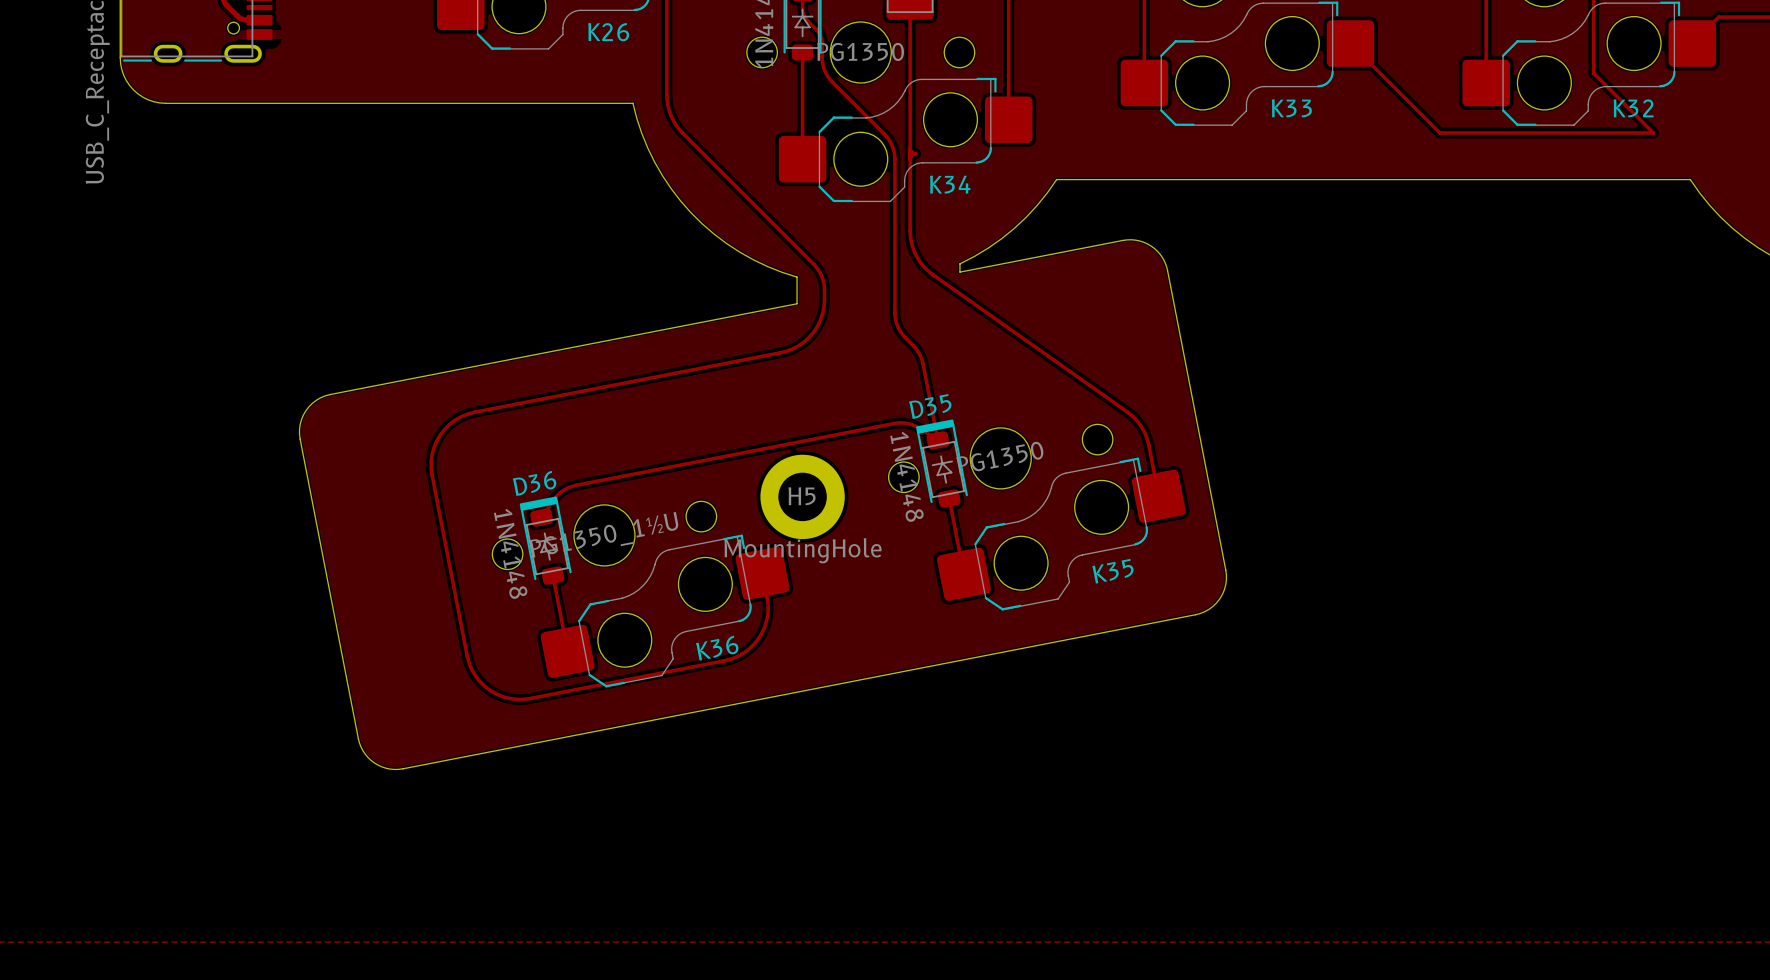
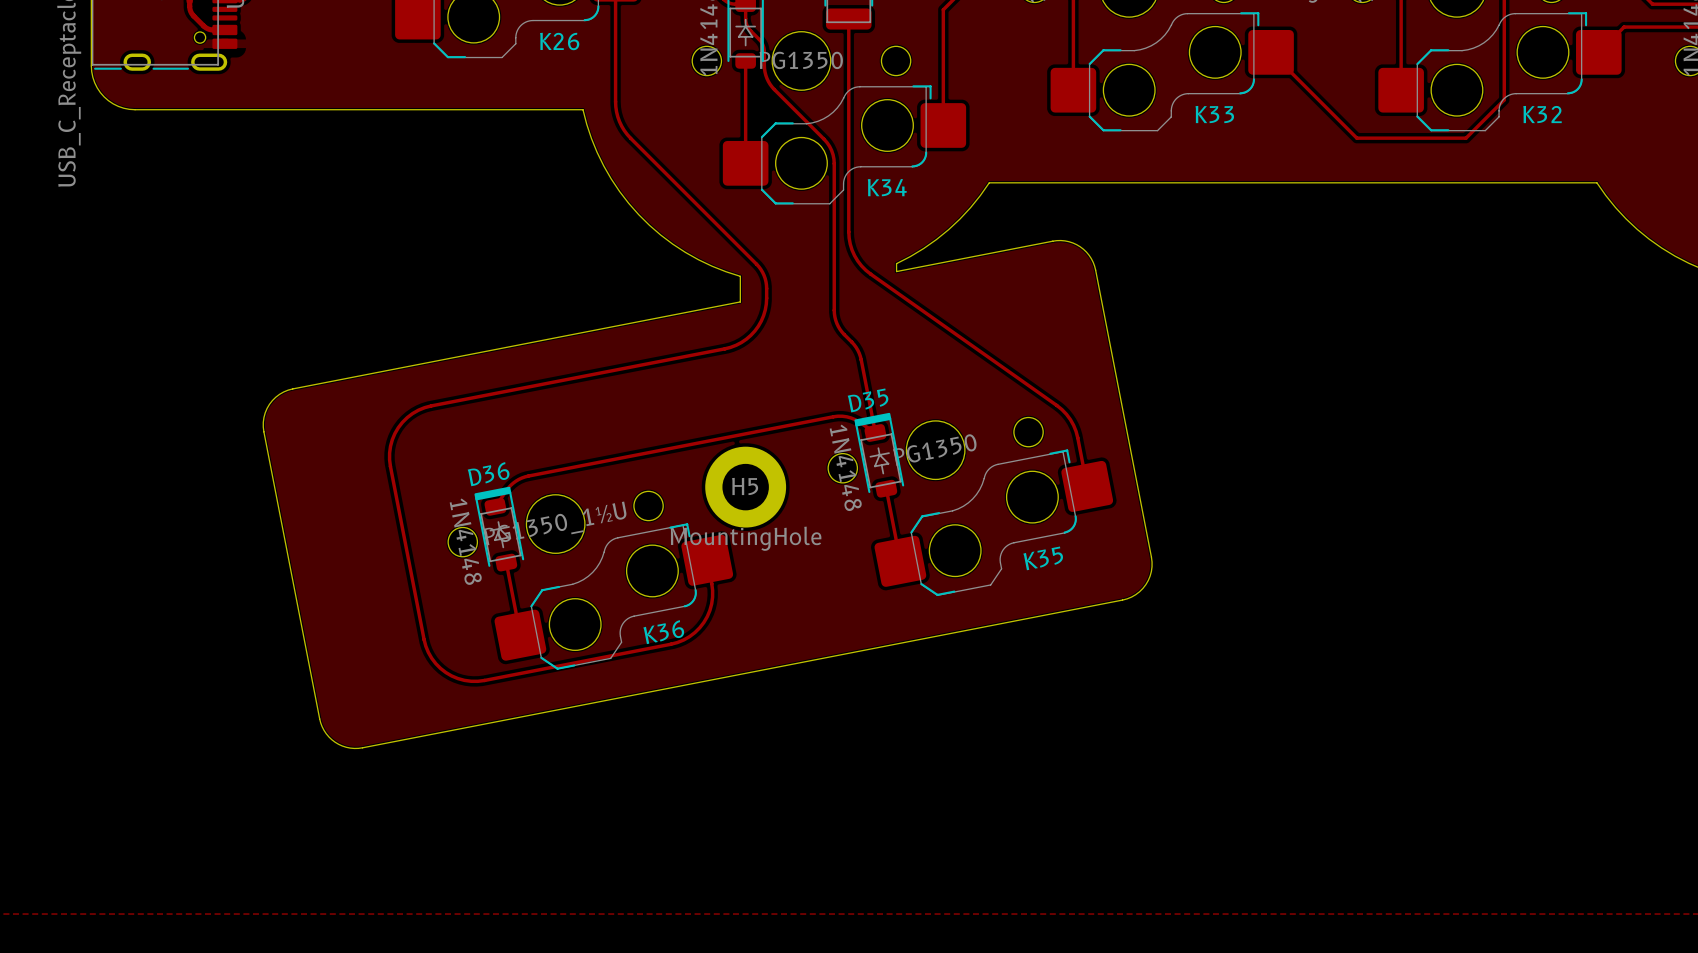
track: (1593, 73) (1653, 133) (1553, 133) -> (1504, 80) (1504, 99) (1466, 138)
track: (910, 148) (911, 152) (915, 153) (911, 155) (910, 159) -> none

